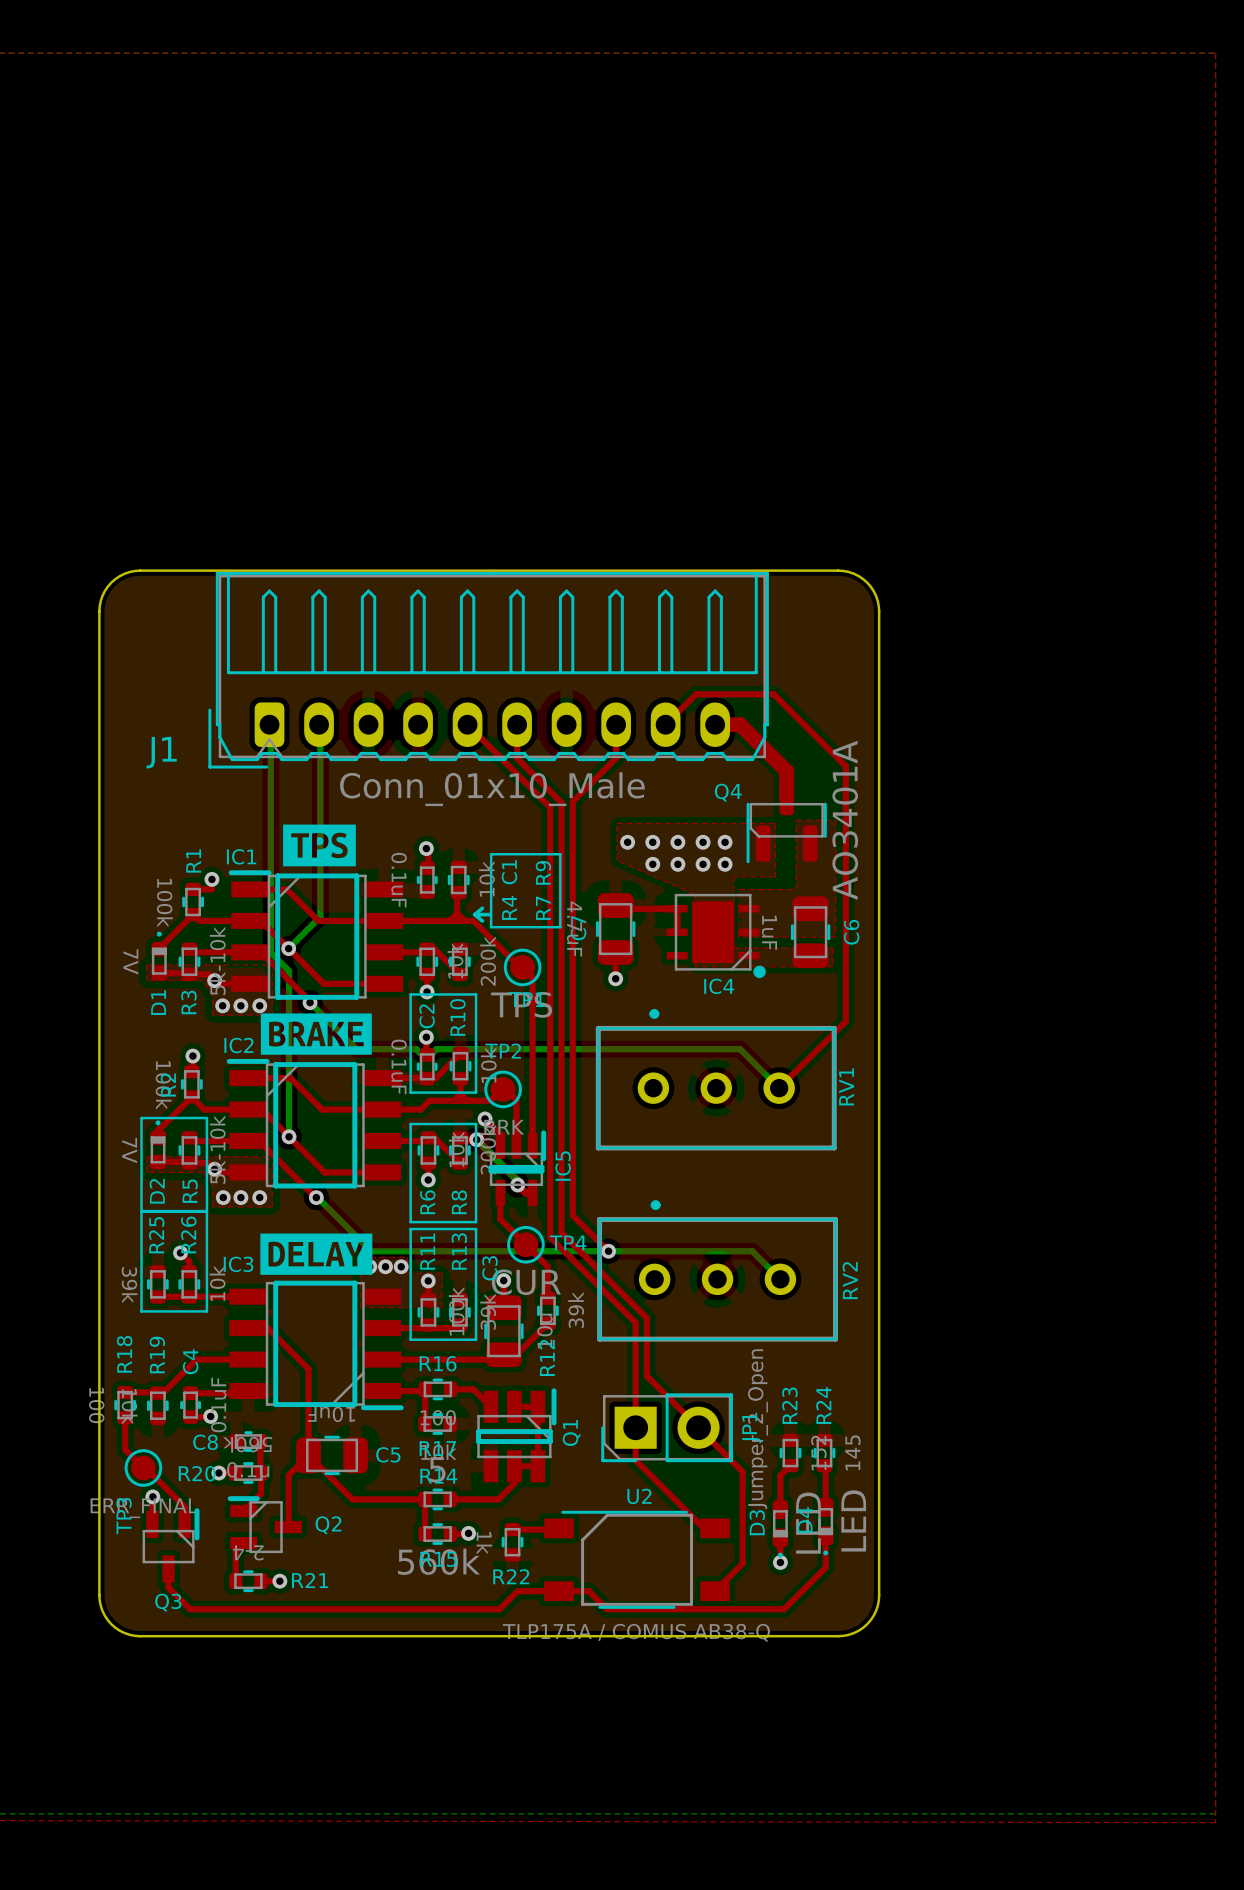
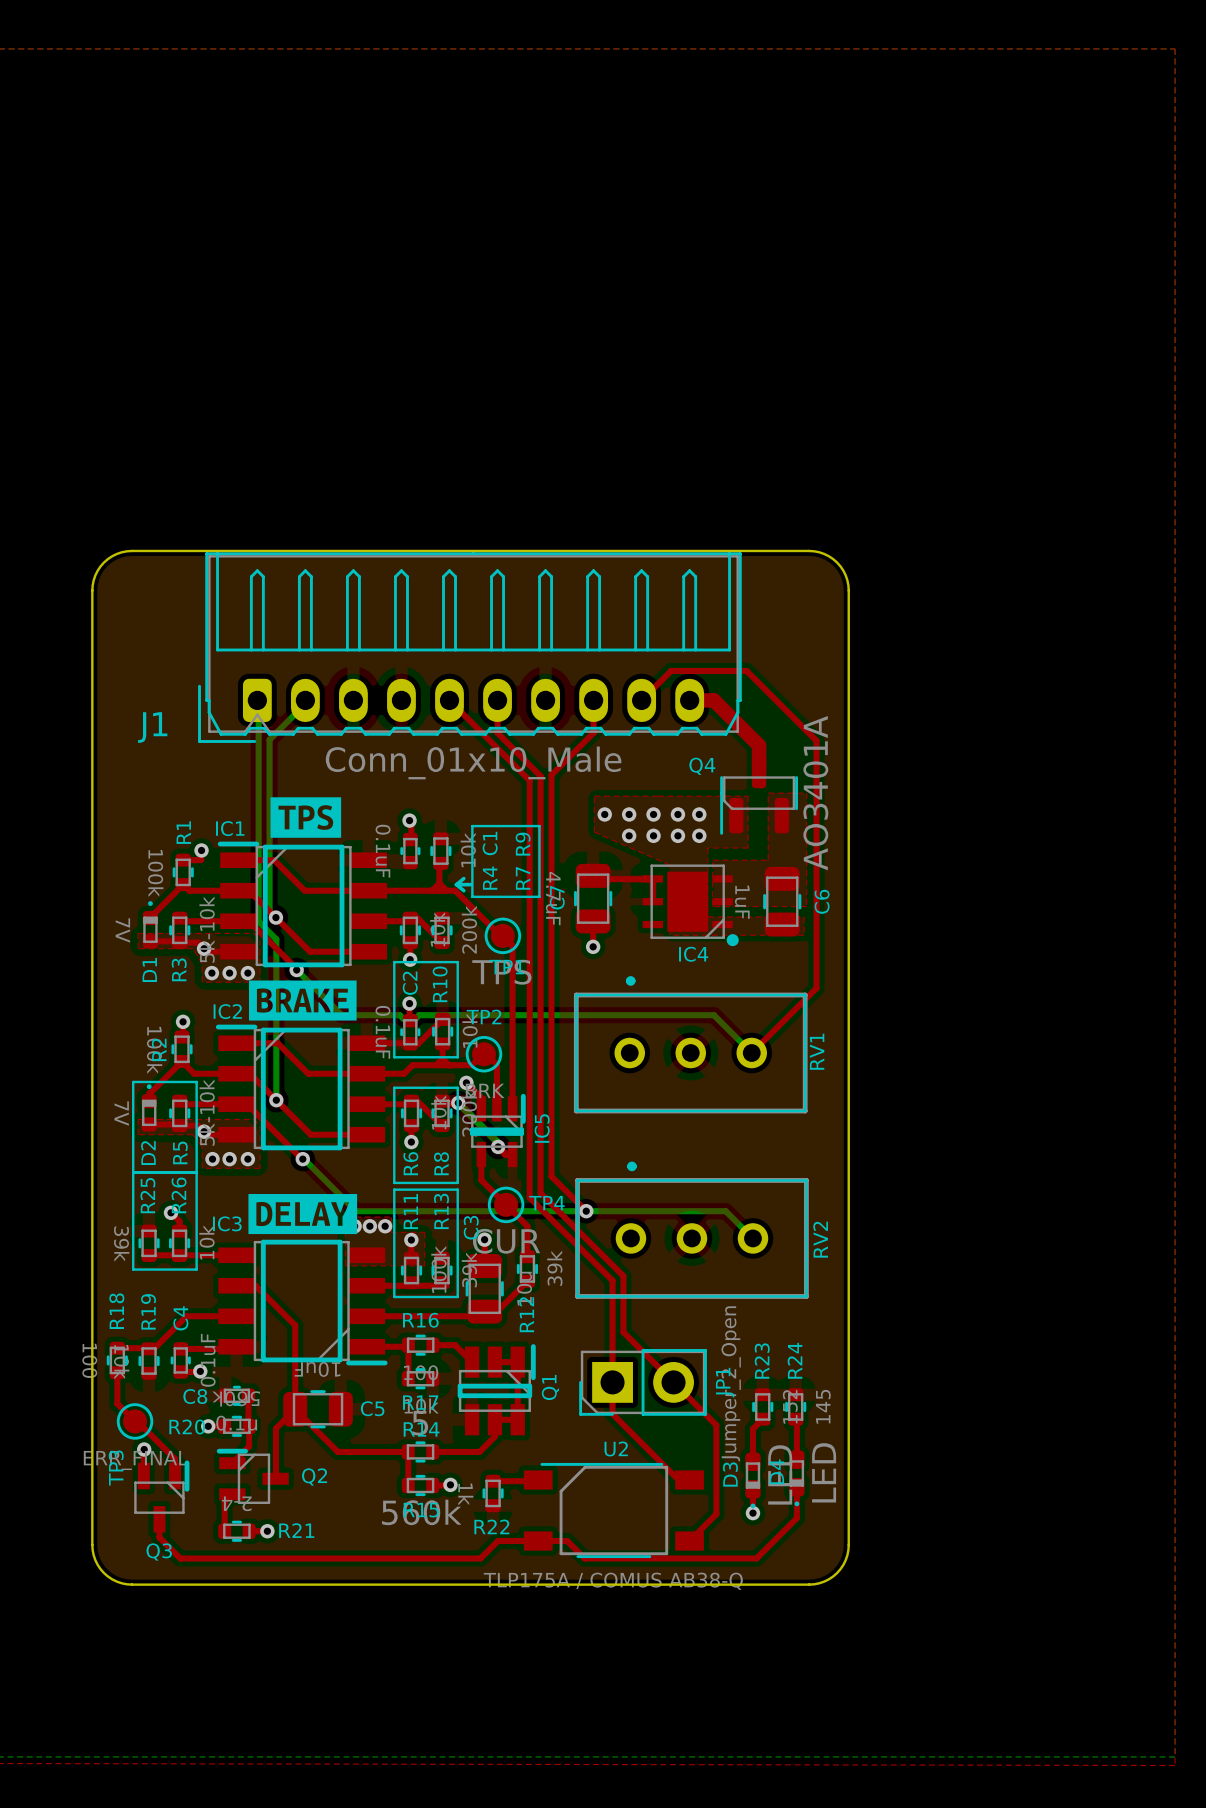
bottom track: (319, 724) (320, 916) (288, 948) -> (305, 700) (305, 703) (269, 739) (269, 911) (275, 917)

